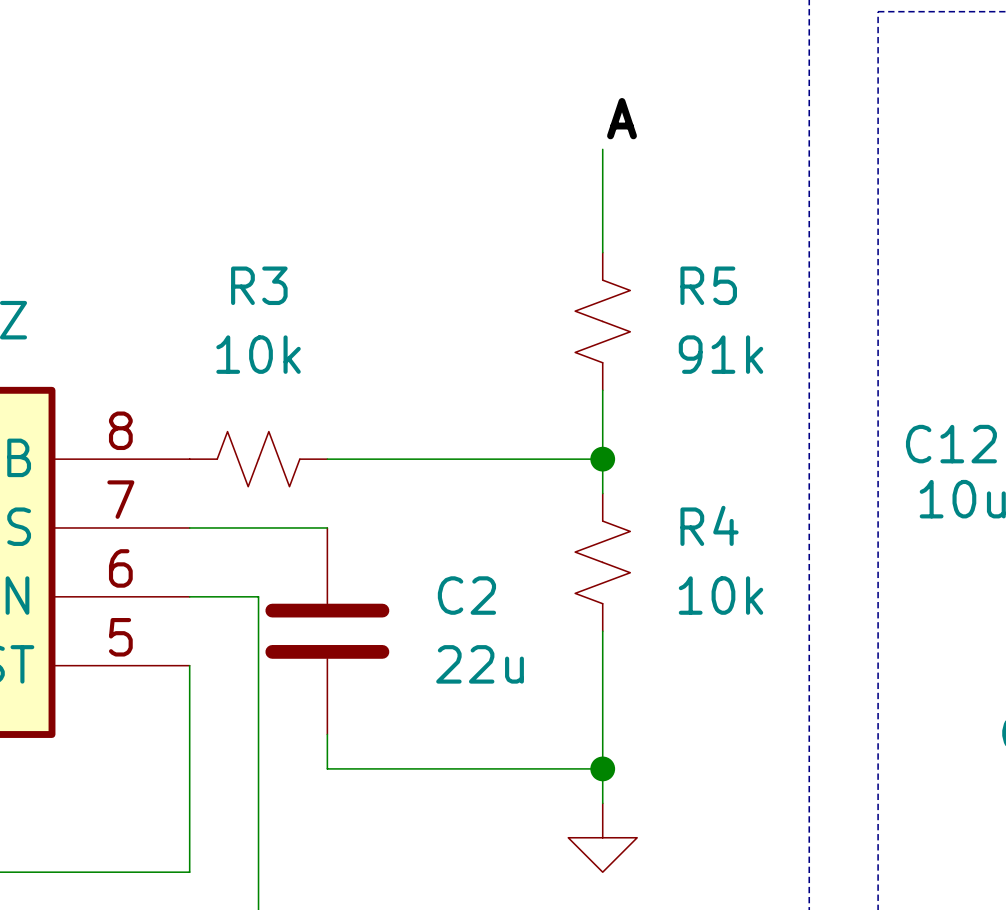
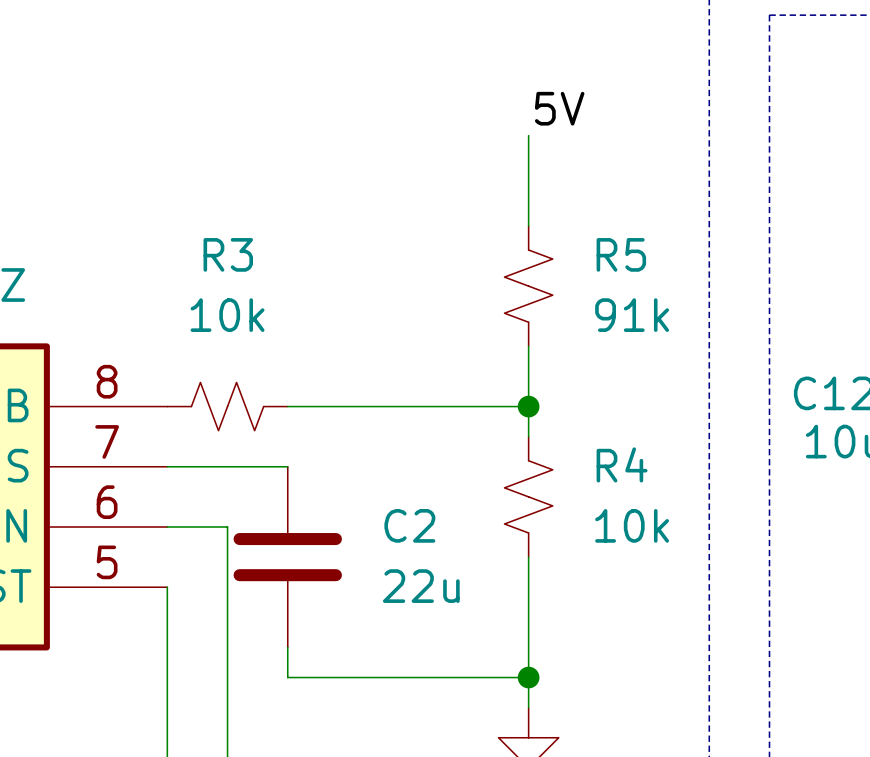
label: A (622, 118) -> 5V (559, 108)

